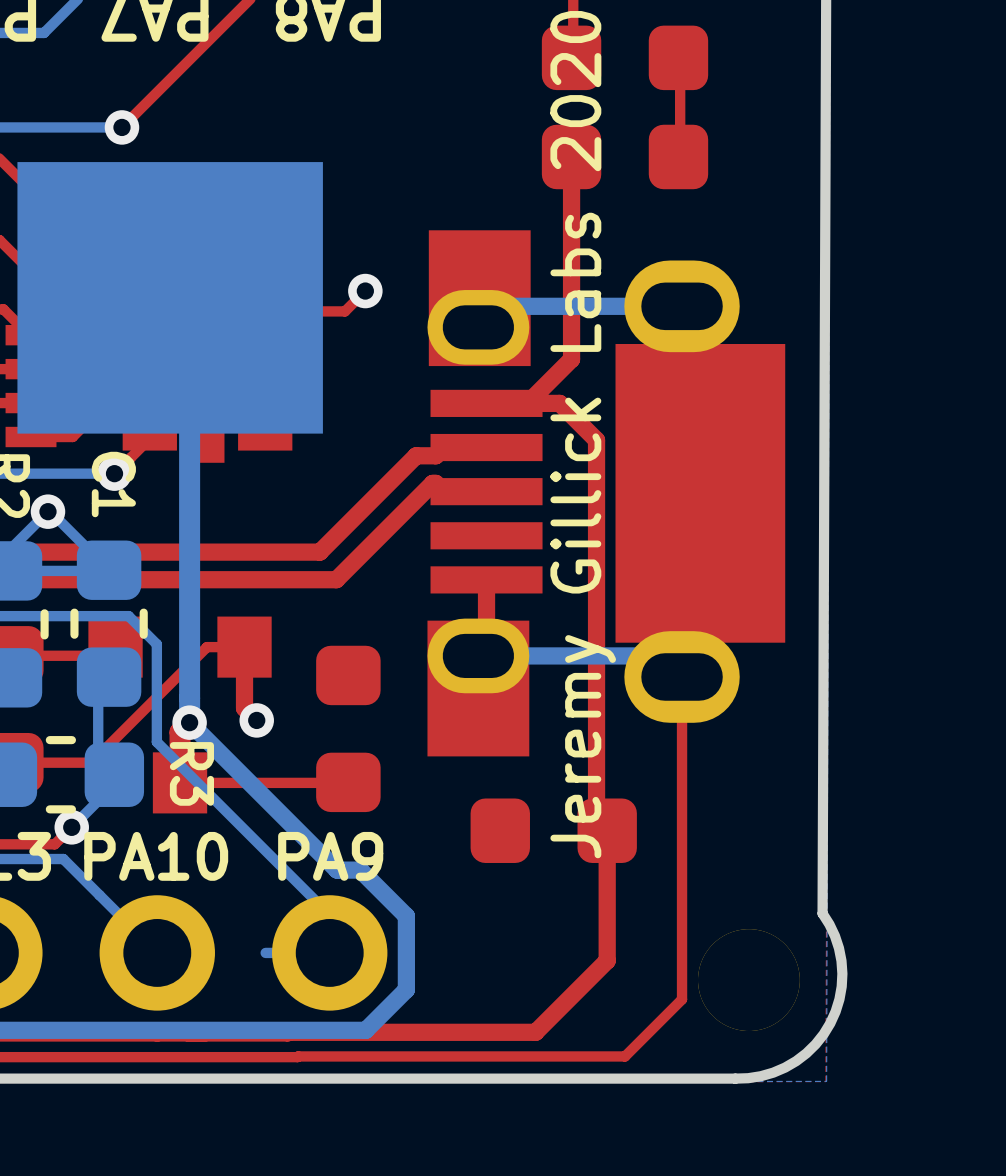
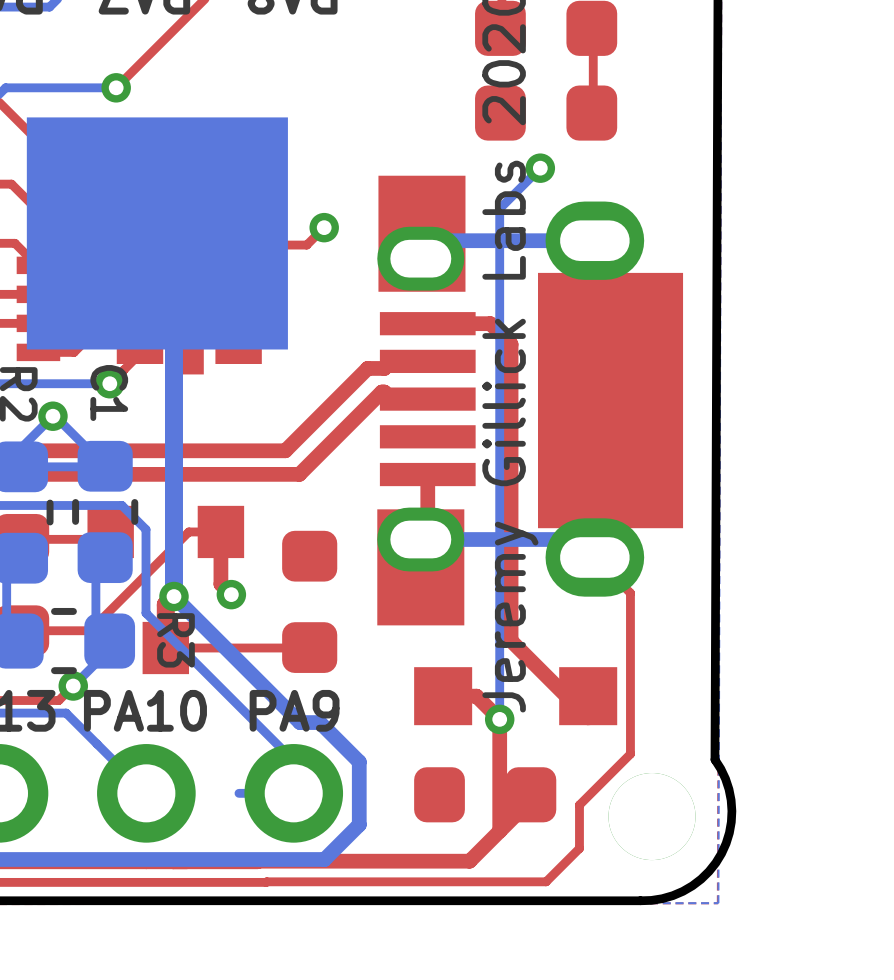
top track: (571, 156) (571, 359) (527, 403) -> none
bottom track: none -> (540, 168) (499, 208) (499, 719)
via: none -> (540, 168)
top track: (583, 427) (596, 440) (596, 820) (607, 830) (607, 954) -> (511, 344) (511, 640) (588, 717)
top track: (682, 676) (682, 999) (664, 1017) -> (594, 557) (630, 593) (630, 754) (579, 805) (579, 848)
part footprint: [470, 798, 637, 863] -> [414, 667, 618, 726]
top track: none -> (443, 696) (476, 696) (499, 719) (499, 831)
via: none -> (499, 719)
part: none -> (485, 794)

